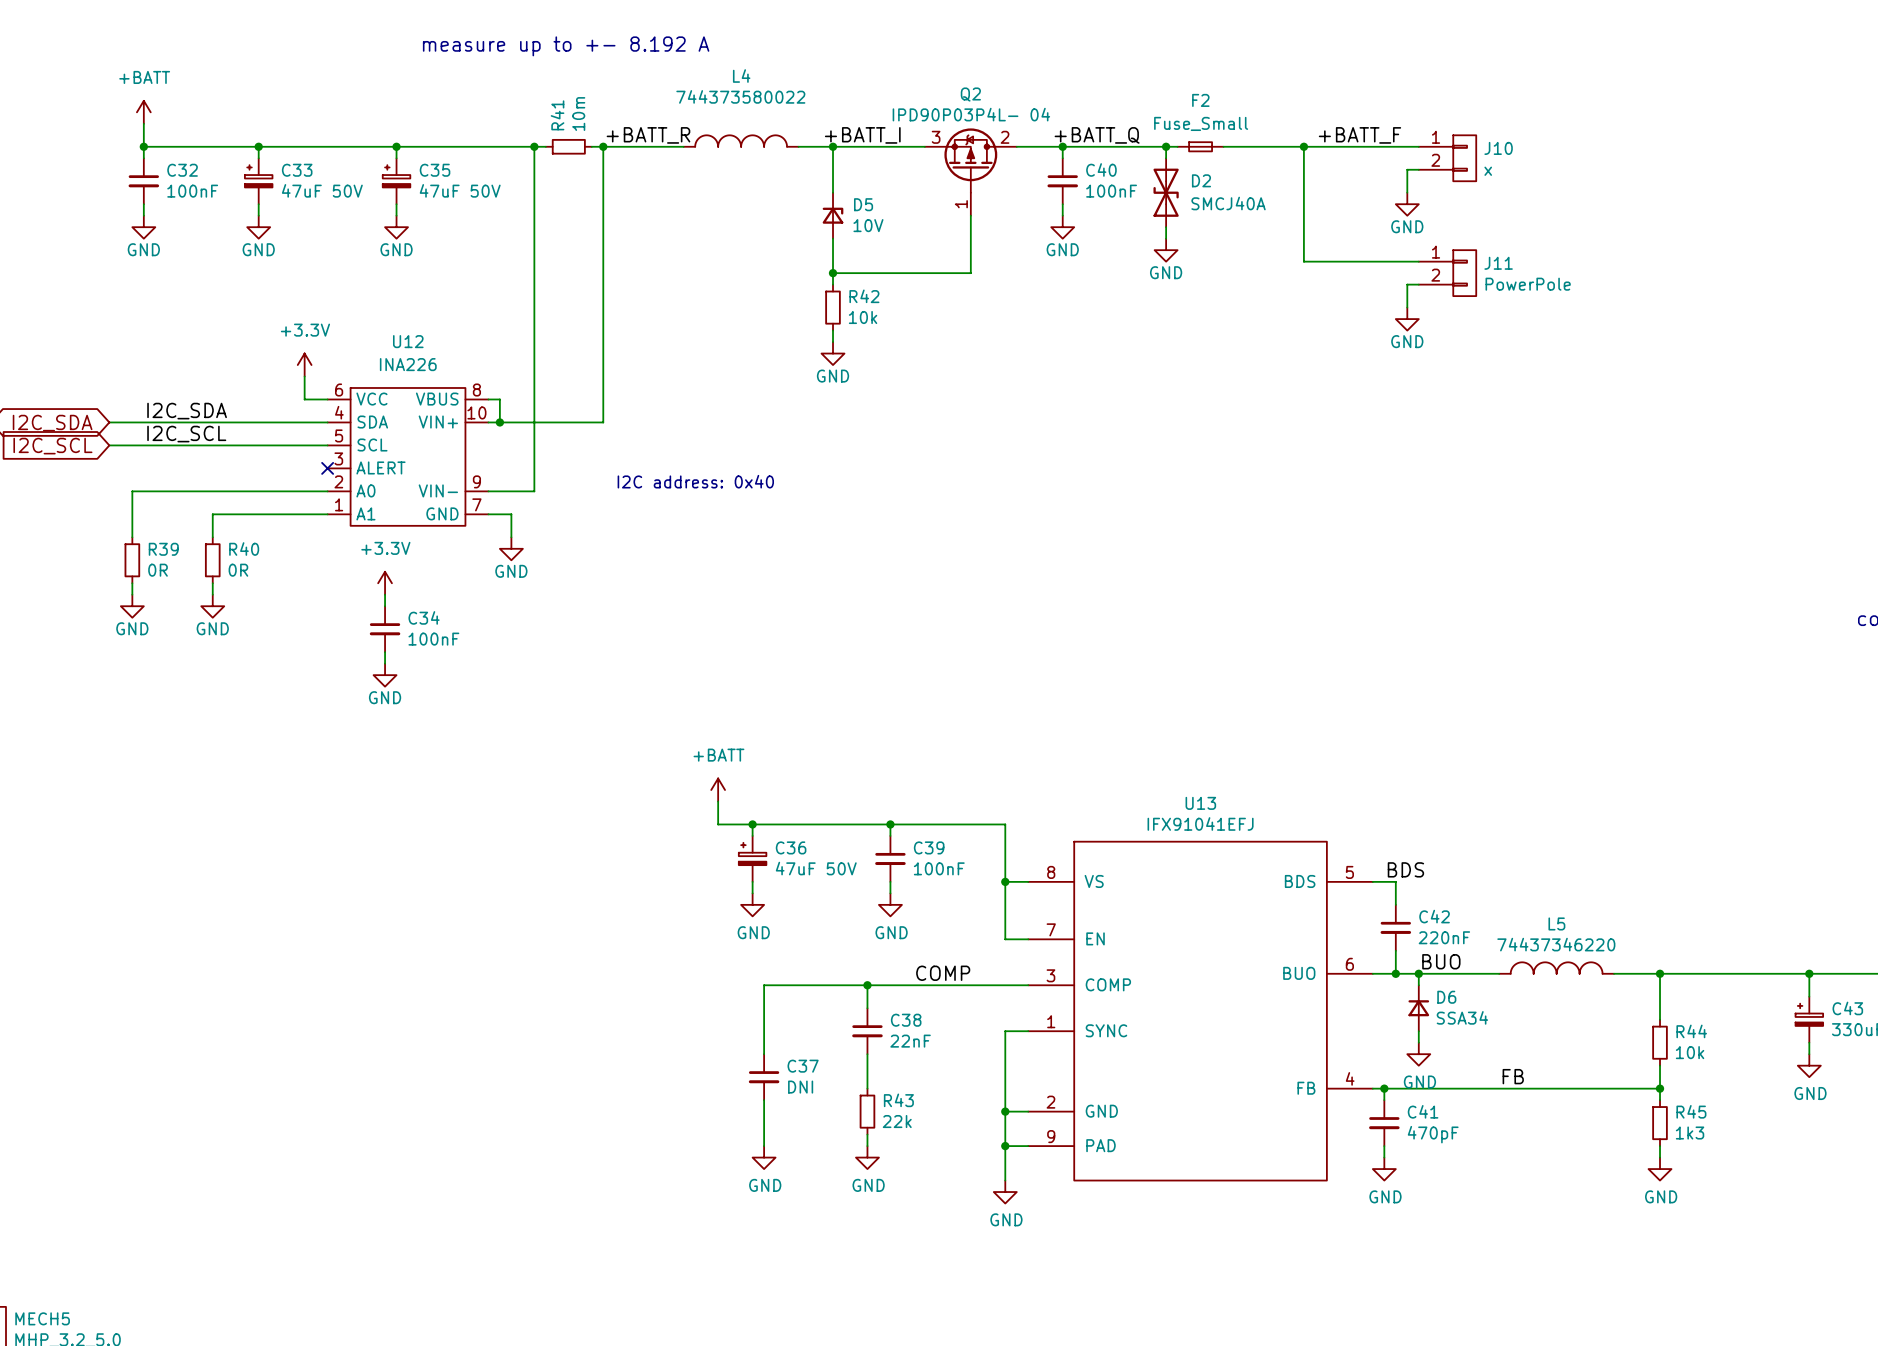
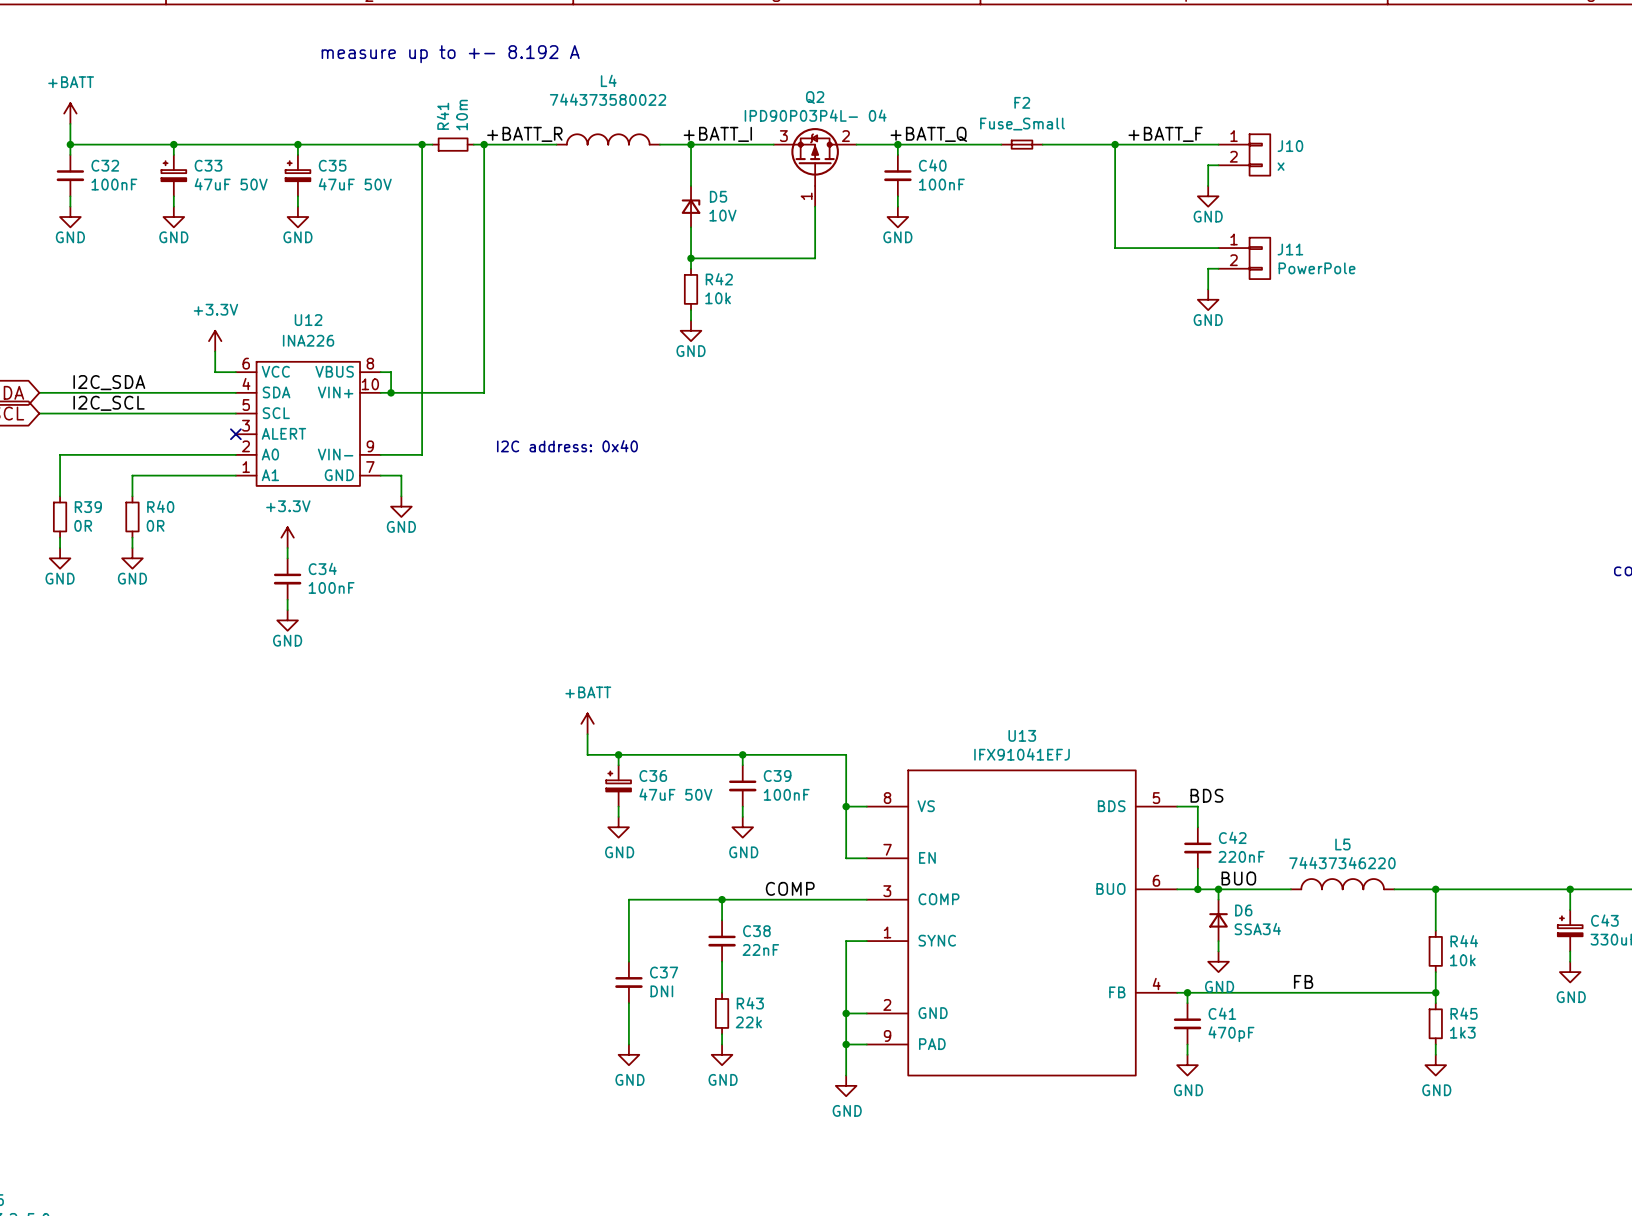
wire: (1166, 146) (1166, 158) -> none
junction: (1166, 146) -> none
D2: SMCJ40A (1166, 192) -> none
wire: (1166, 227) (1166, 238) -> none
power symbol: GND (1166, 250) -> none

